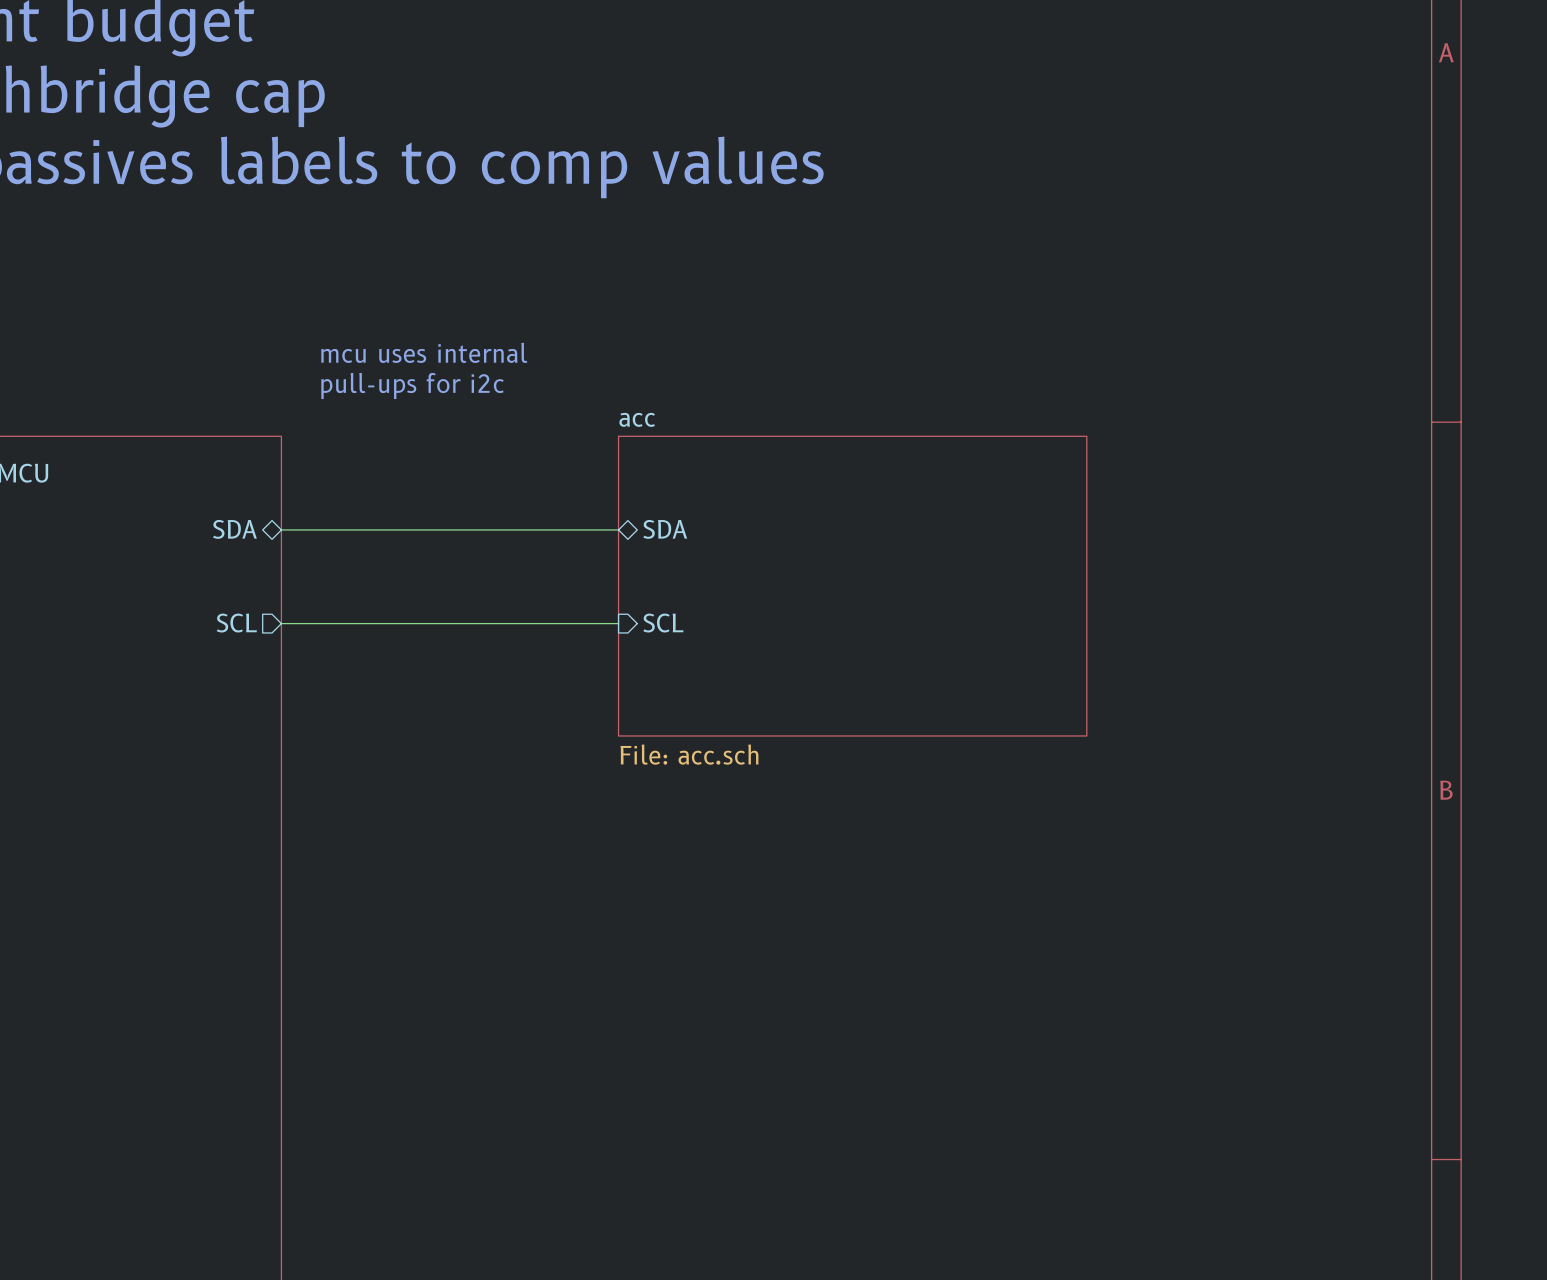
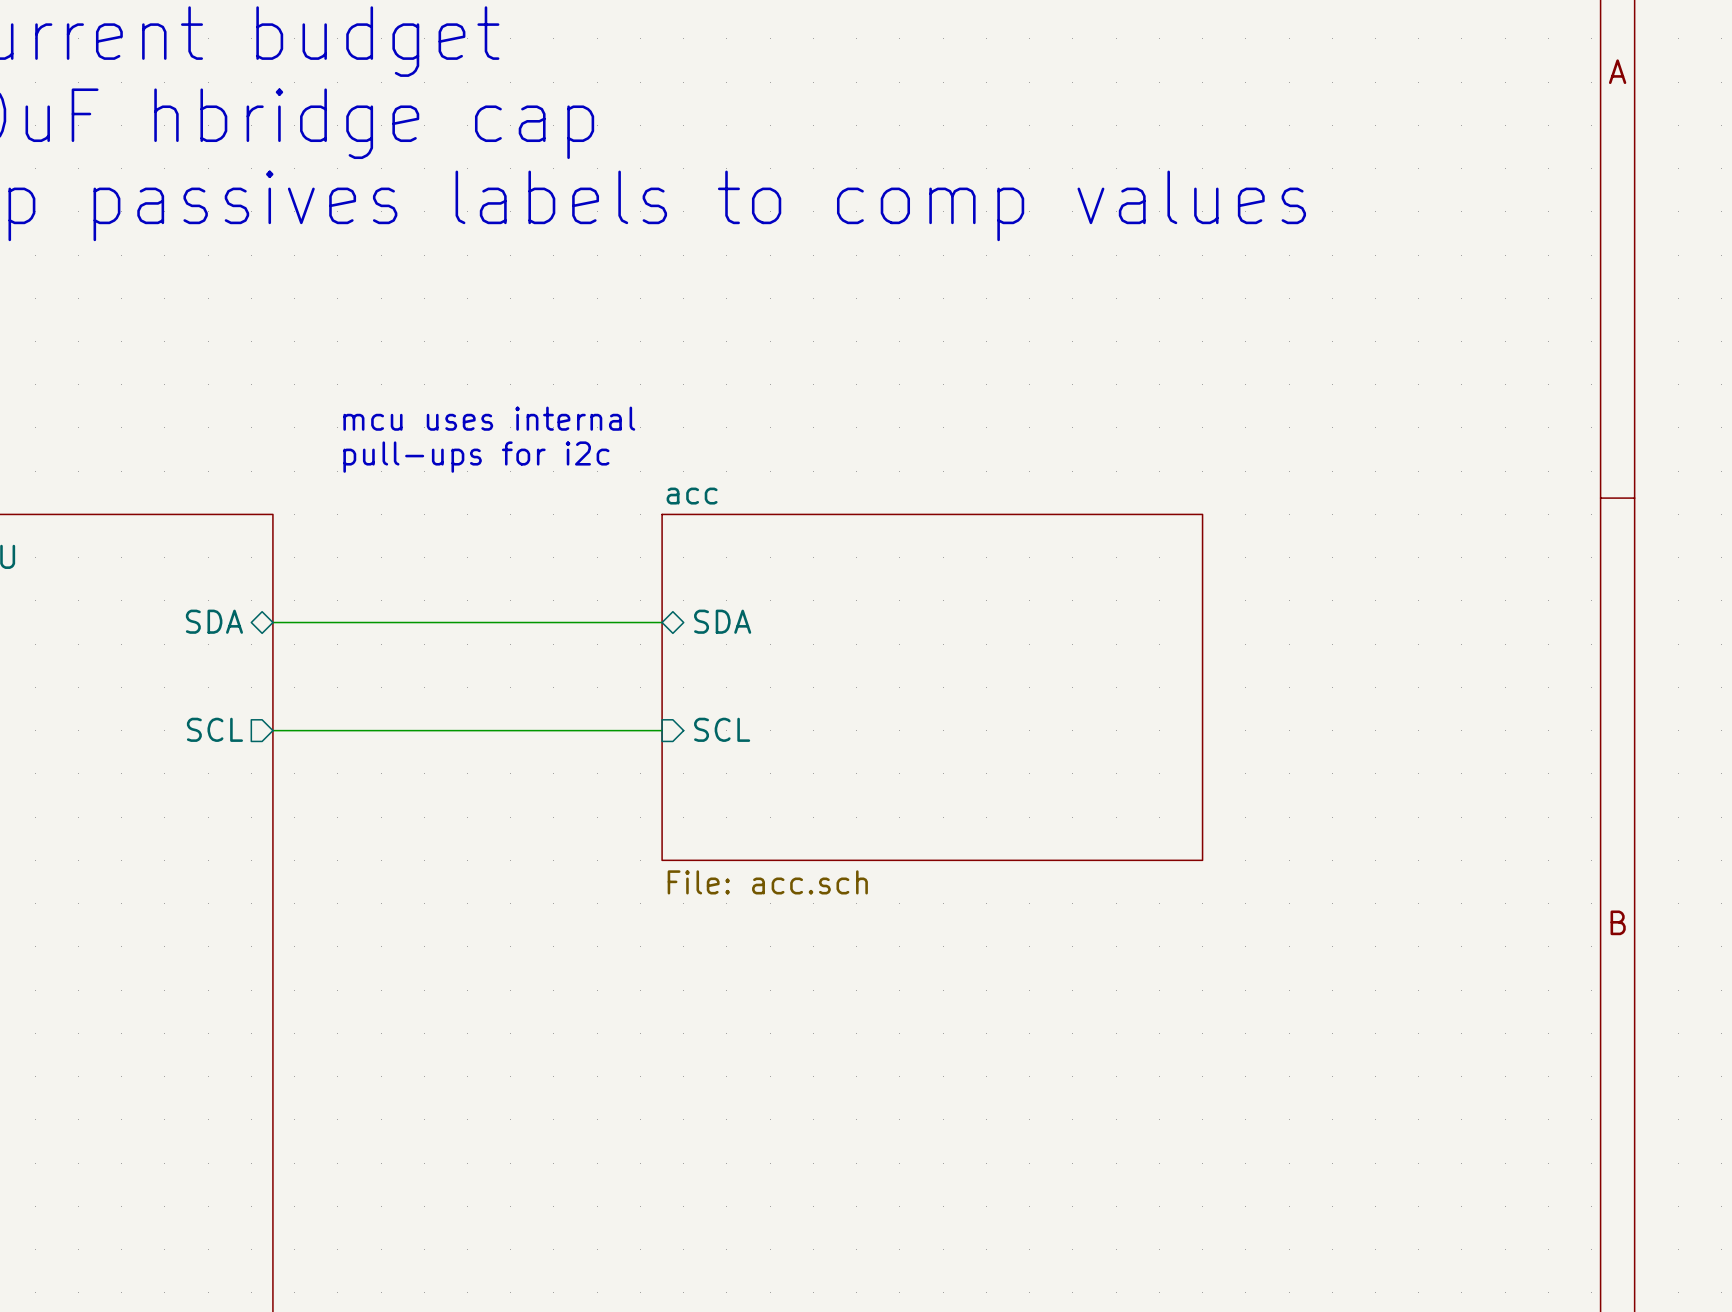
text position: mcu uses internal (424, 352) -> mcu uses internal (489, 418)
text position: pull-ups for i2c (412, 385) -> pull-ups for i2c (476, 457)

